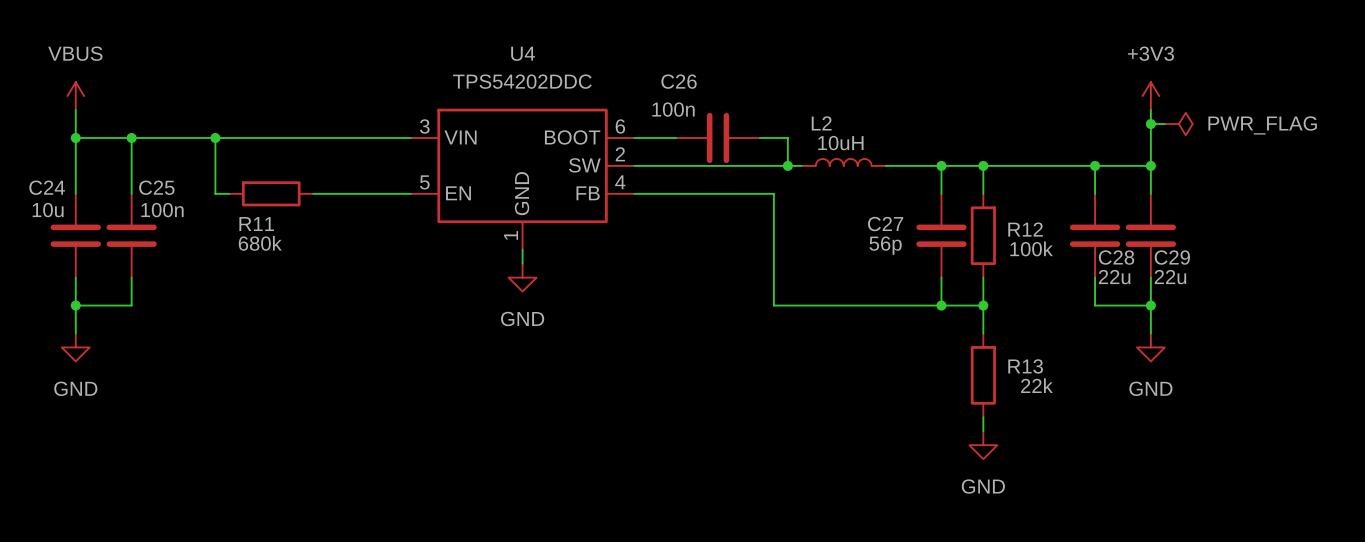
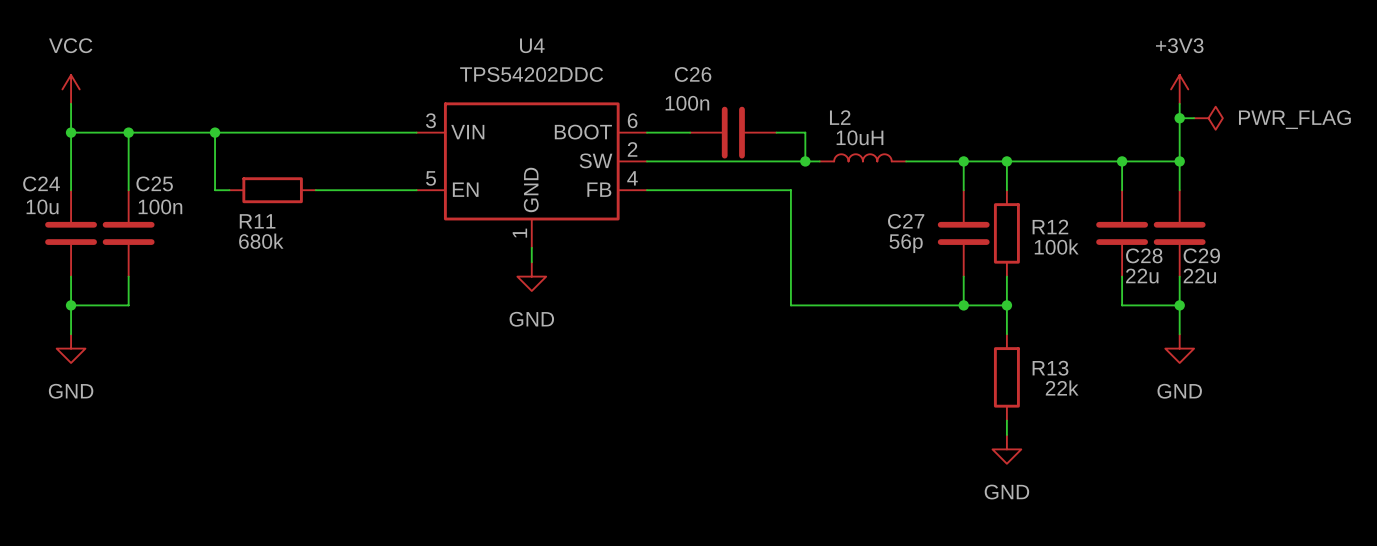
power symbol: VBUS (75, 96) -> VCC (71, 89)

